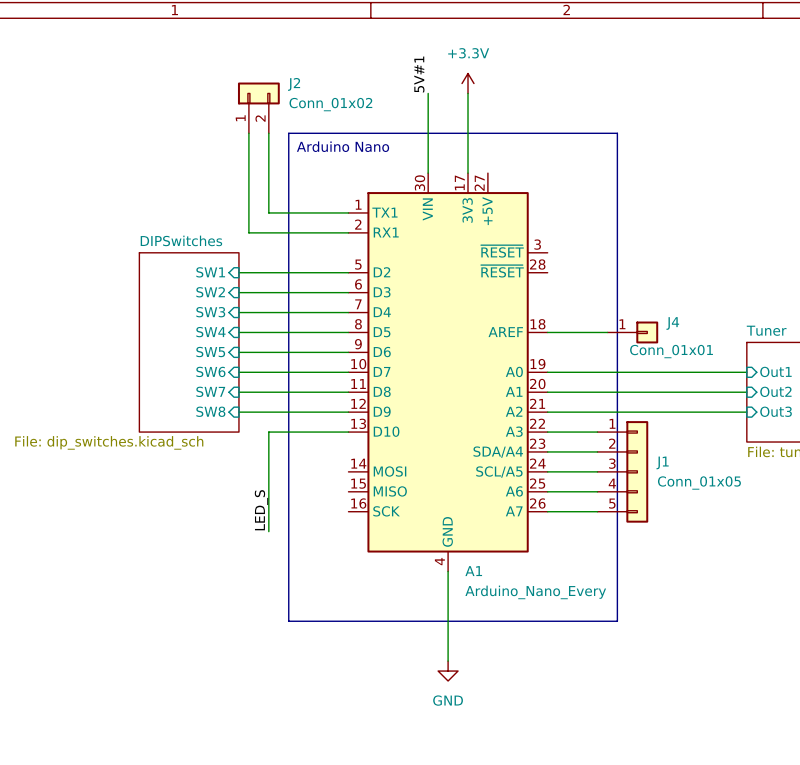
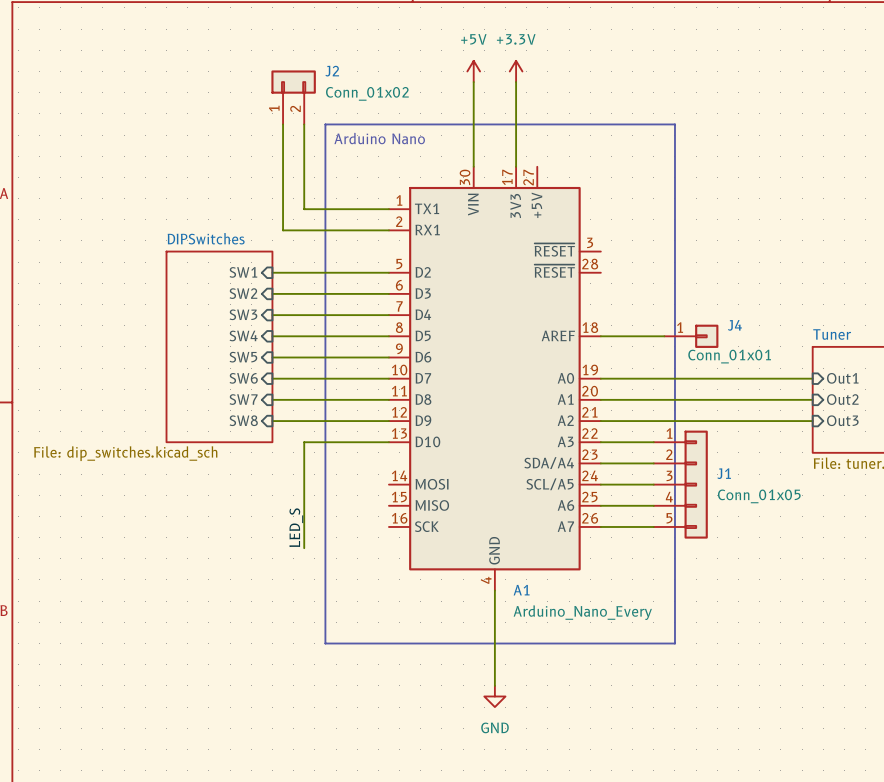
label: 5V#1 (419, 74) -> none
power symbol: none -> +5V (473, 71)

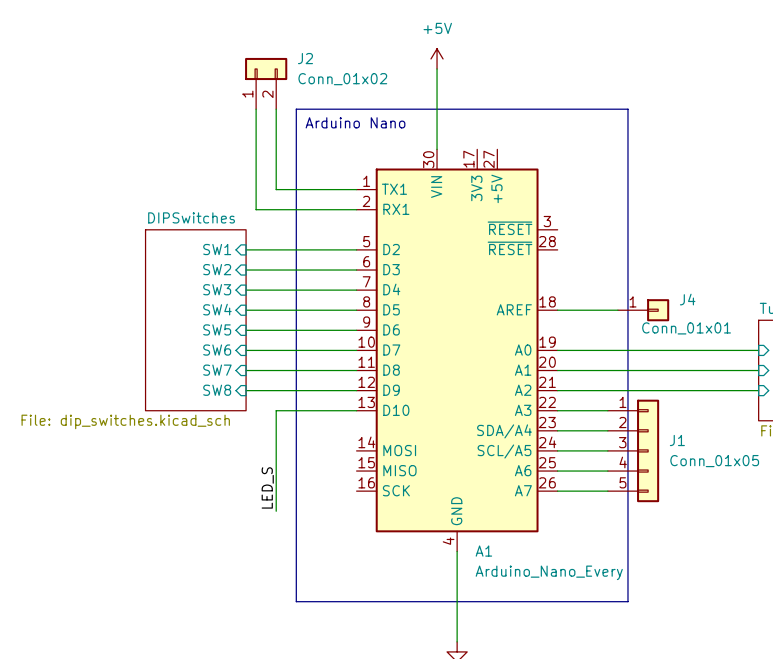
power symbol: +3.3V (516, 71) -> none
wire: (516, 82) (516, 166) -> none

